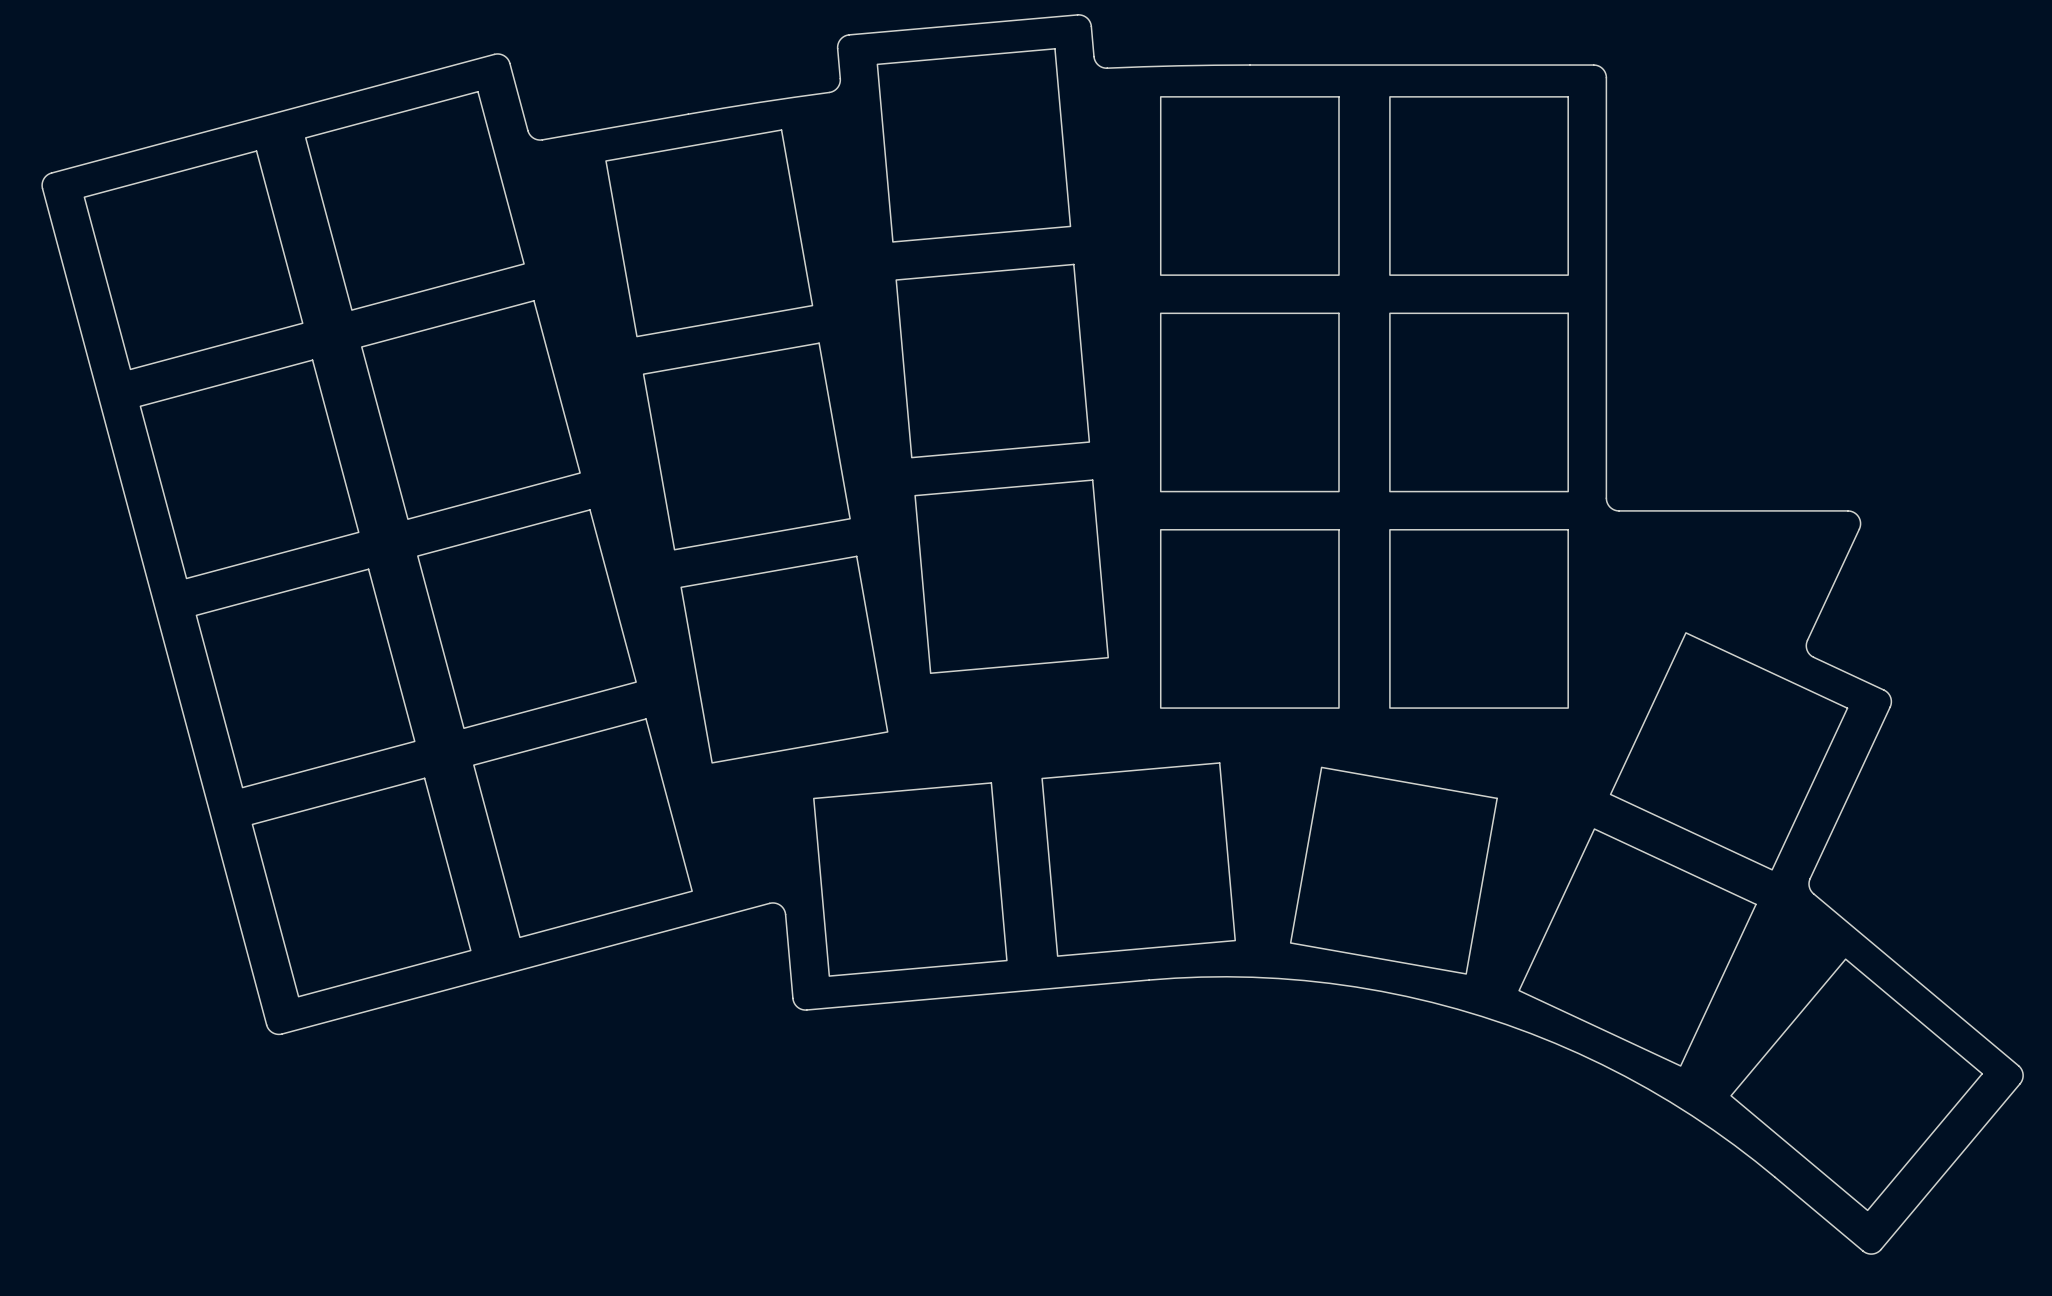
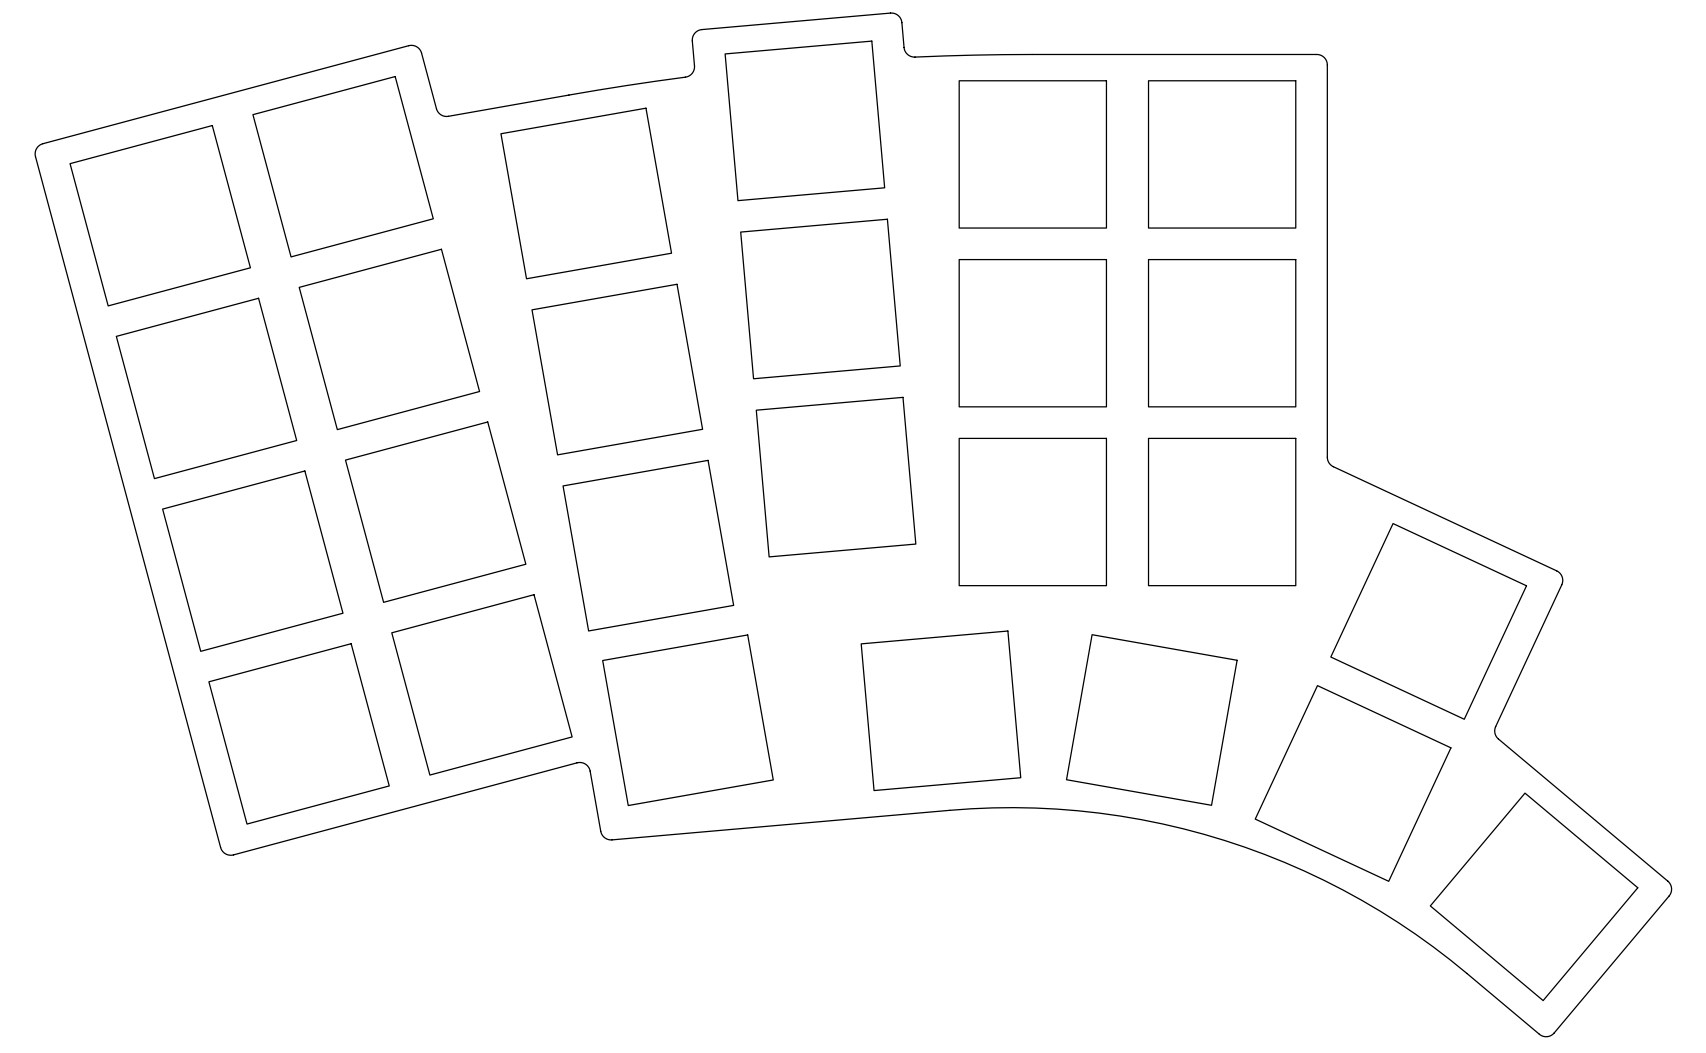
board edge: (1606, 498) (1609, 506) (1617, 510) (1847, 510) (1855, 513) (1859, 519) (1859, 527) (1806, 641) (1807, 650) (1813, 657) -> (1327, 412) (1327, 458) (1331, 465) (1498, 543)
drawing: none -> [602, 634, 774, 807]
drawing: [813, 782, 1008, 977] -> none
board edge: (698, 922) (771, 903) (781, 906) (785, 914) (793, 999) (798, 1007) (806, 1010) -> (577, 762) (584, 763) (589, 768) (600, 831) (604, 837) (612, 839) (666, 835)

